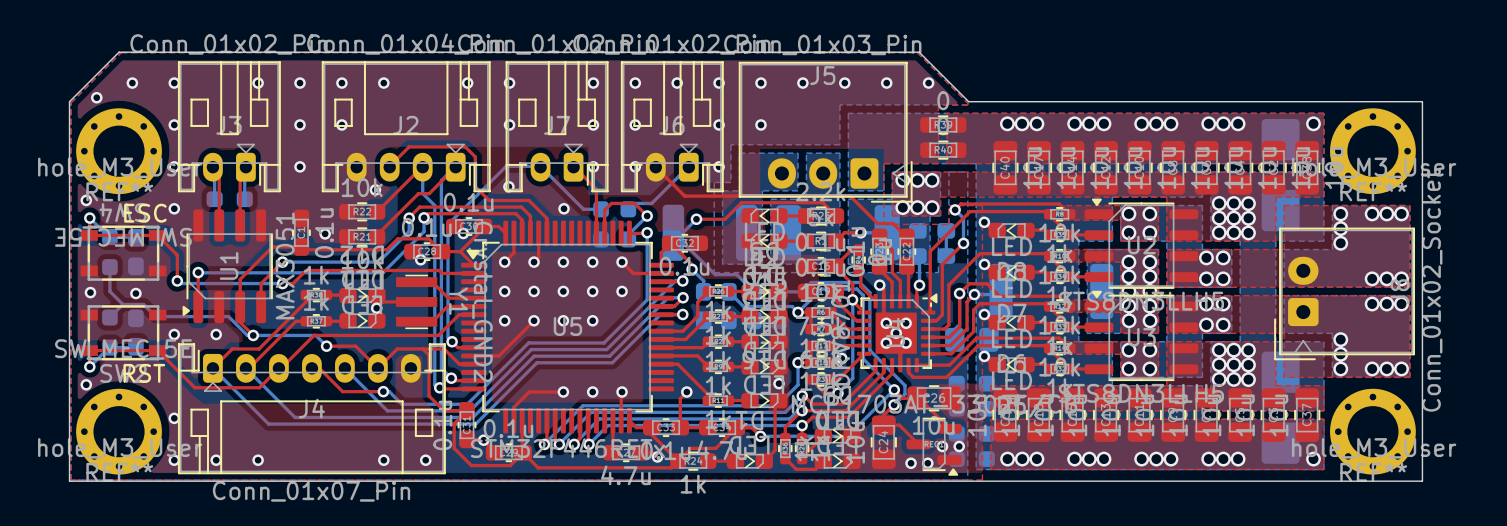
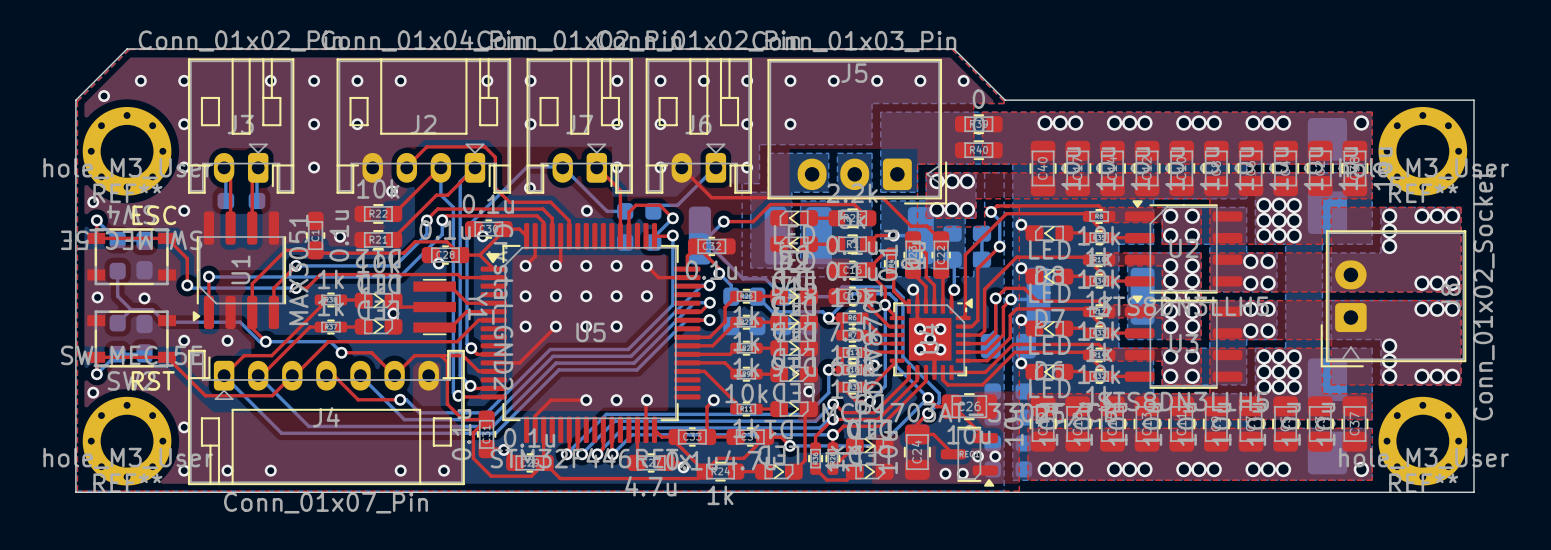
part value: 1k (718, 385) -> 10k (746, 393)

